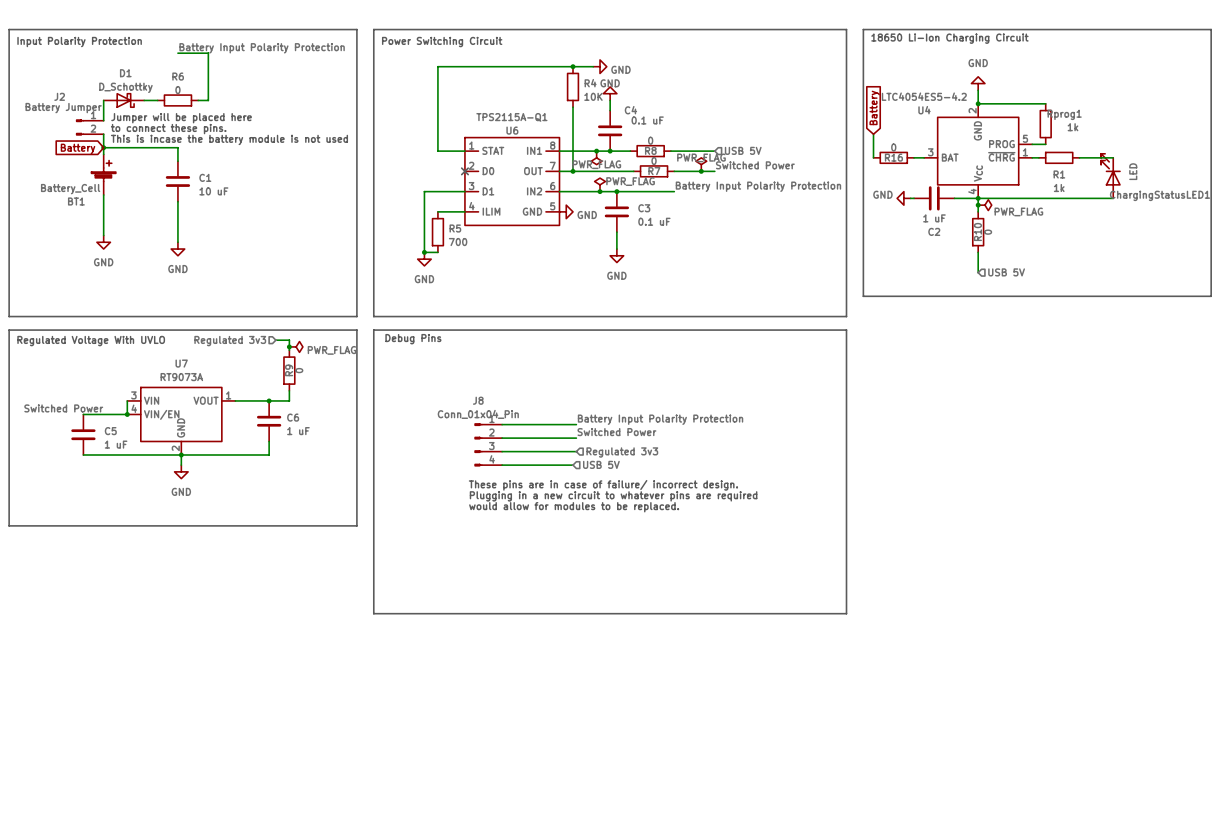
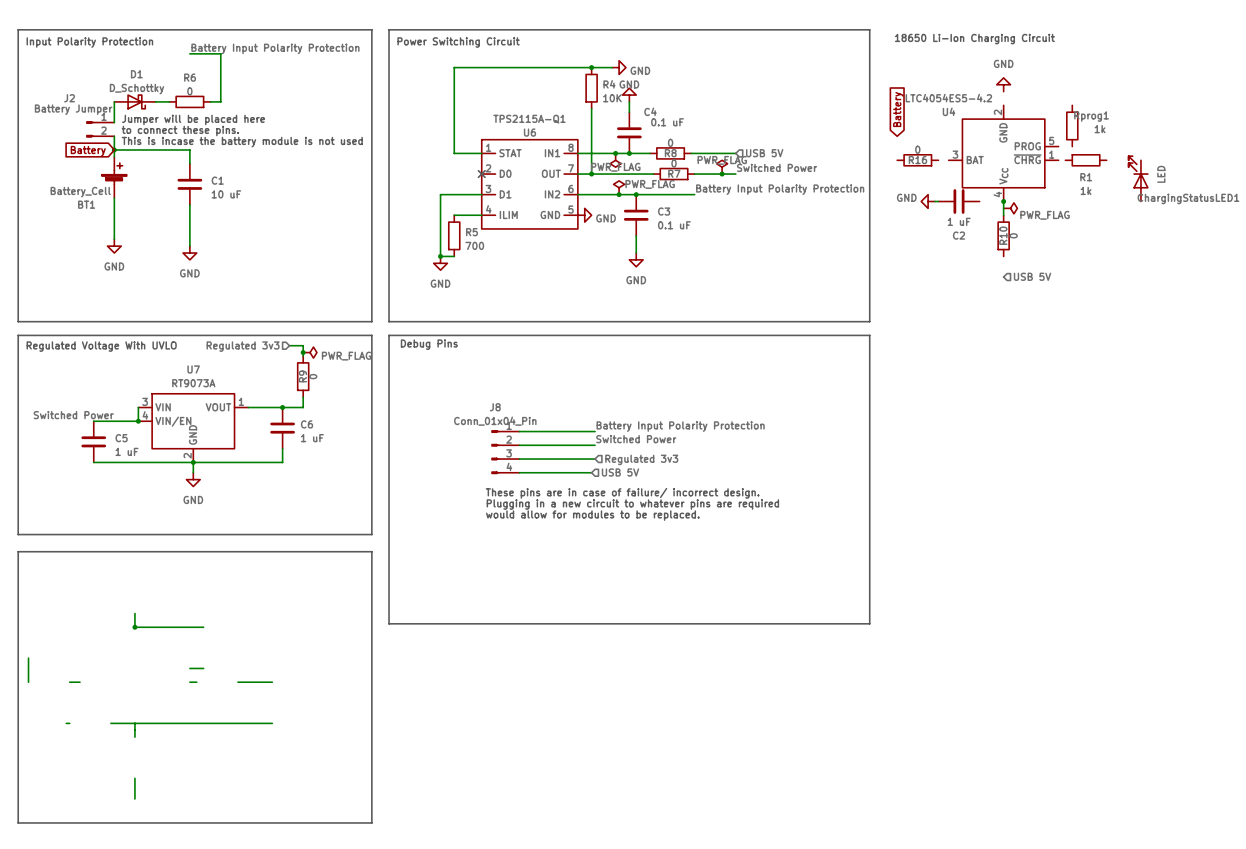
line: (863, 29) (1211, 29) (1211, 296) (863, 296) (863, 29) -> none
wire: (978, 90) (978, 103) (1045, 103) -> none
junction: (978, 103) -> none
wire: (873, 134) (873, 157) -> none
wire: (1032, 144) (1045, 144) -> none
wire: (914, 157) (924, 157) -> none
wire: (1032, 157) (1038, 157) -> none
wire: (1079, 157) (1113, 157) -> none
wire: (954, 198) (1113, 198) -> none
junction: (978, 205) -> none
wire: (978, 252) (978, 272) -> none
line: none -> (18, 551) (371, 551) (371, 822) (18, 822) (18, 551)
wire: none -> (134, 613) (134, 627) (203, 627)
junction: none -> (134, 627)
wire: none -> (28, 658) (28, 682)
wire: none -> (189, 668) (203, 668)
wire: none -> (69, 682) (80, 682)
wire: none -> (189, 682) (196, 682)
wire: none -> (237, 682) (272, 682)
wire: none -> (66, 723) (69, 723)
wire: none -> (110, 723) (272, 723)
wire: none -> (134, 723) (134, 737)
wire: none -> (134, 778) (134, 798)

